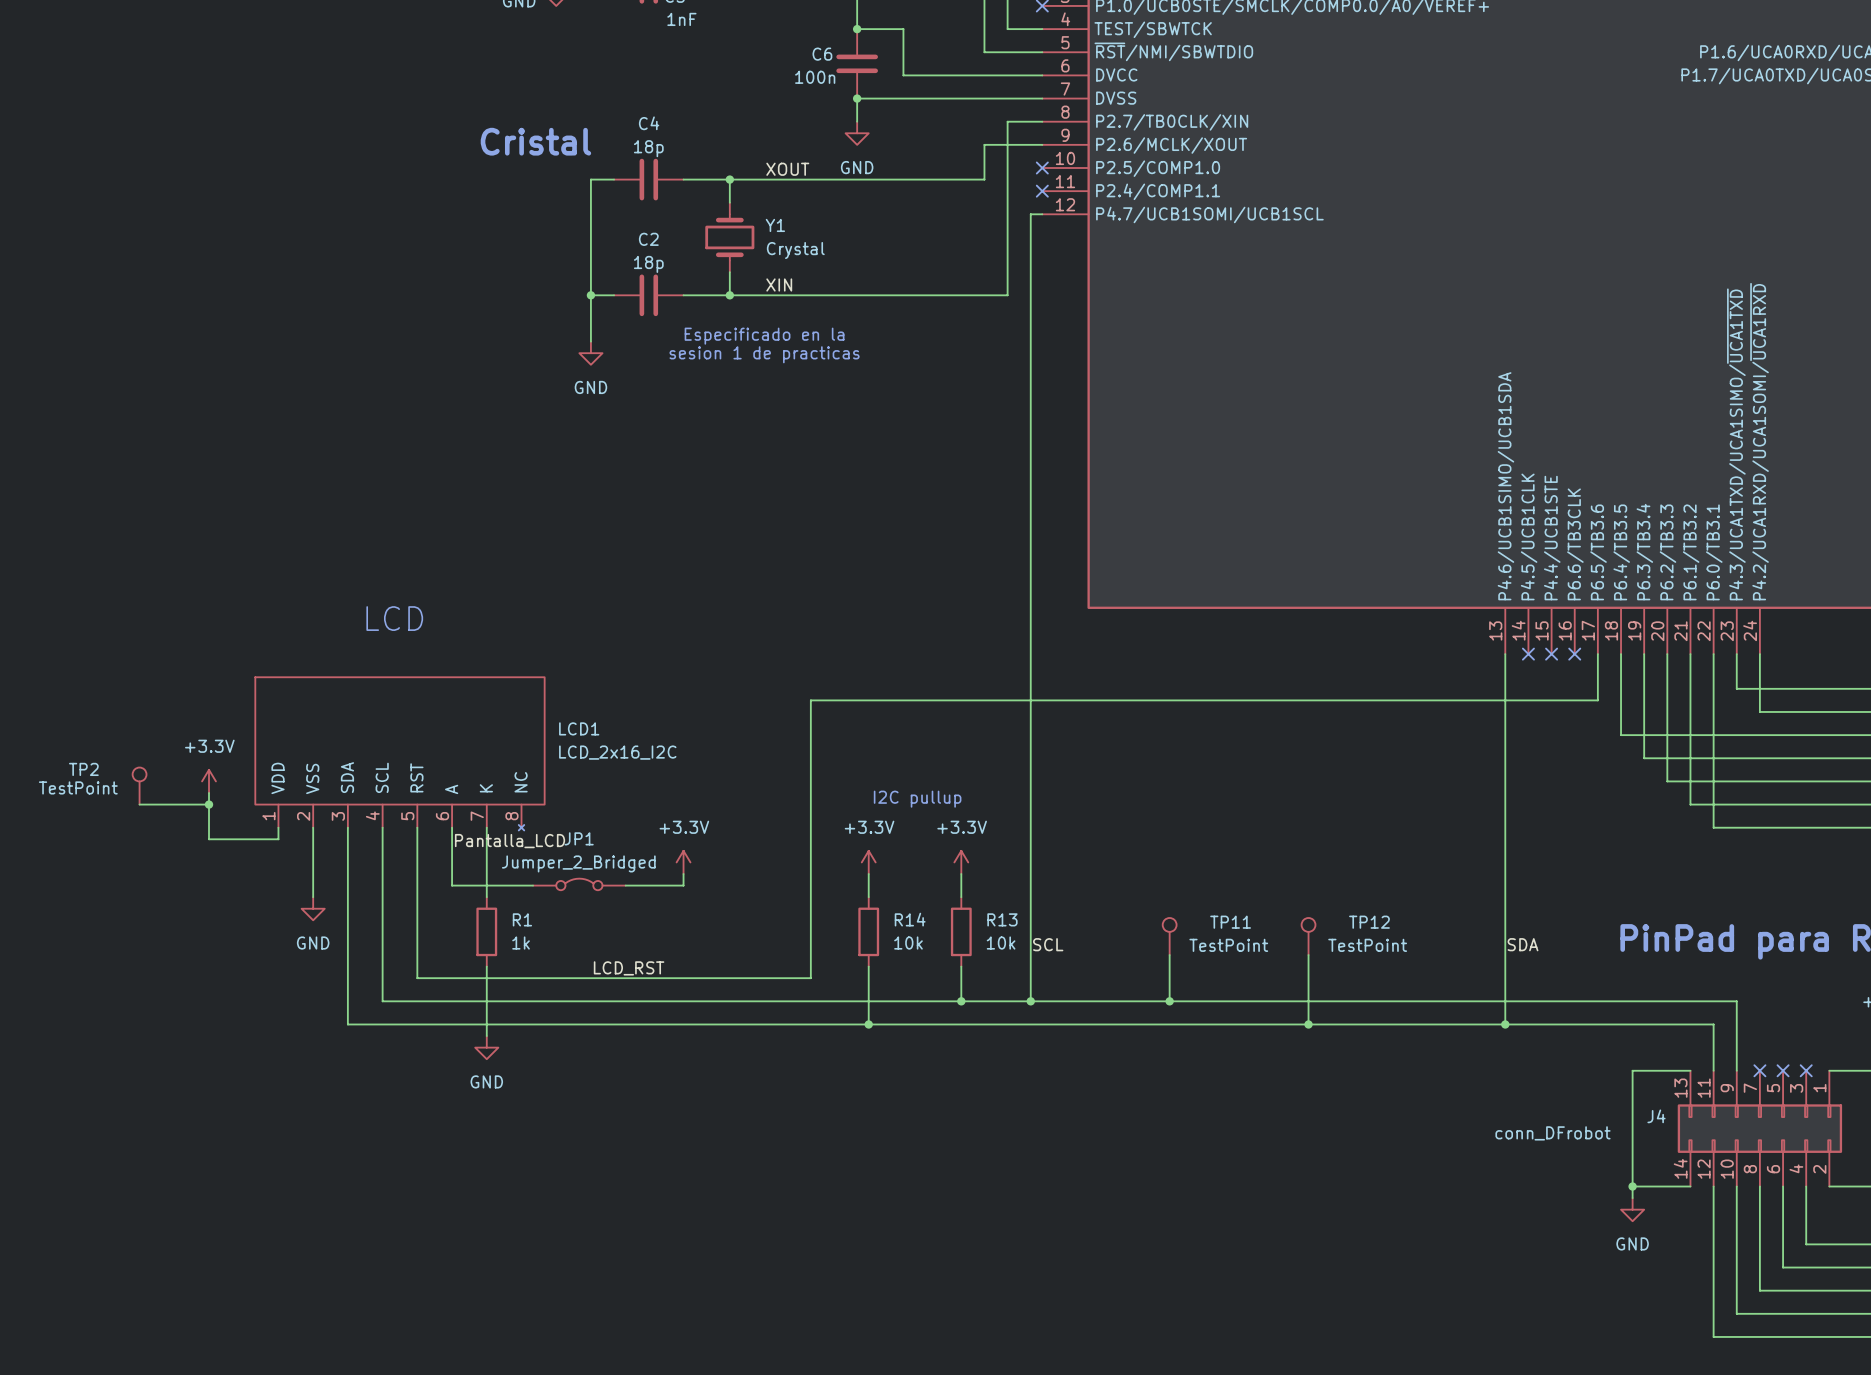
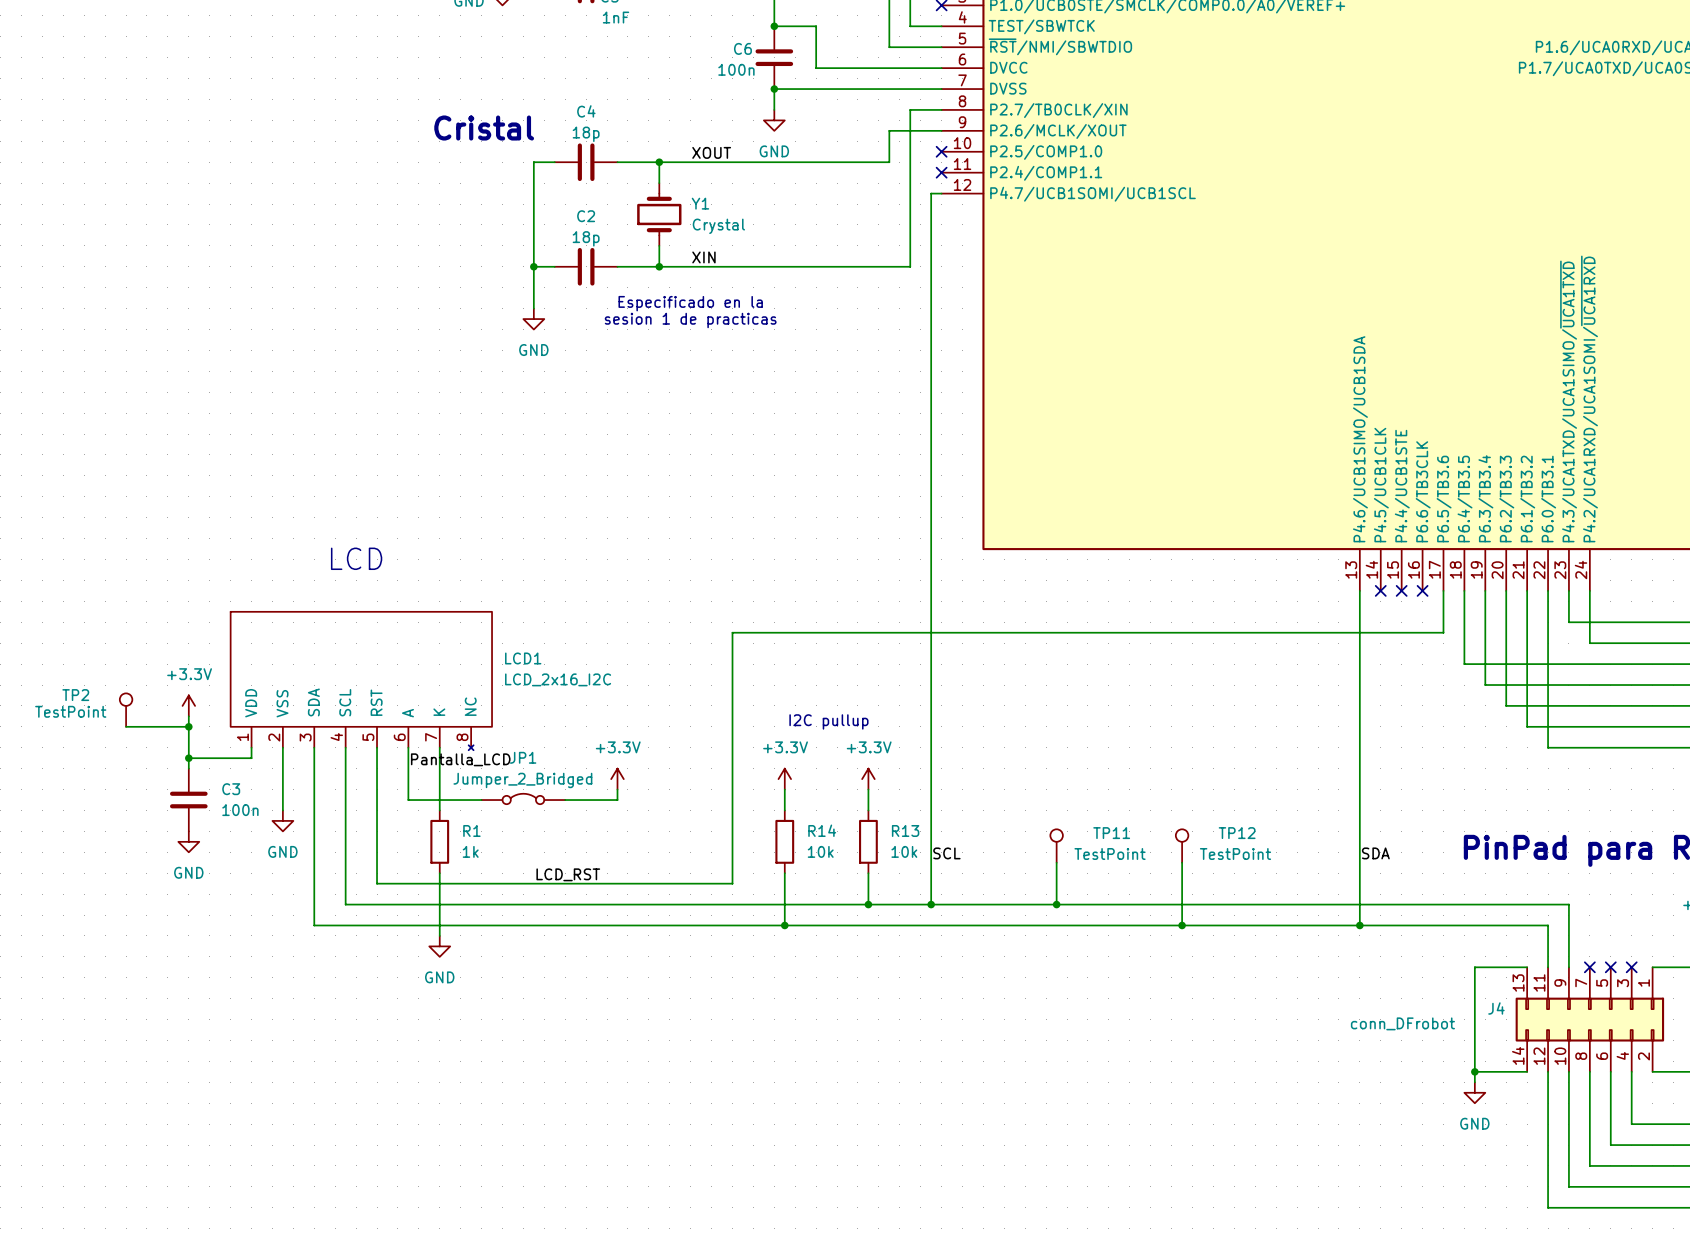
wire: none -> (188, 758) (188, 768)
junction: none -> (188, 758)
C3: none -> 100n (188, 800)
power symbol: none -> GND (188, 841)

